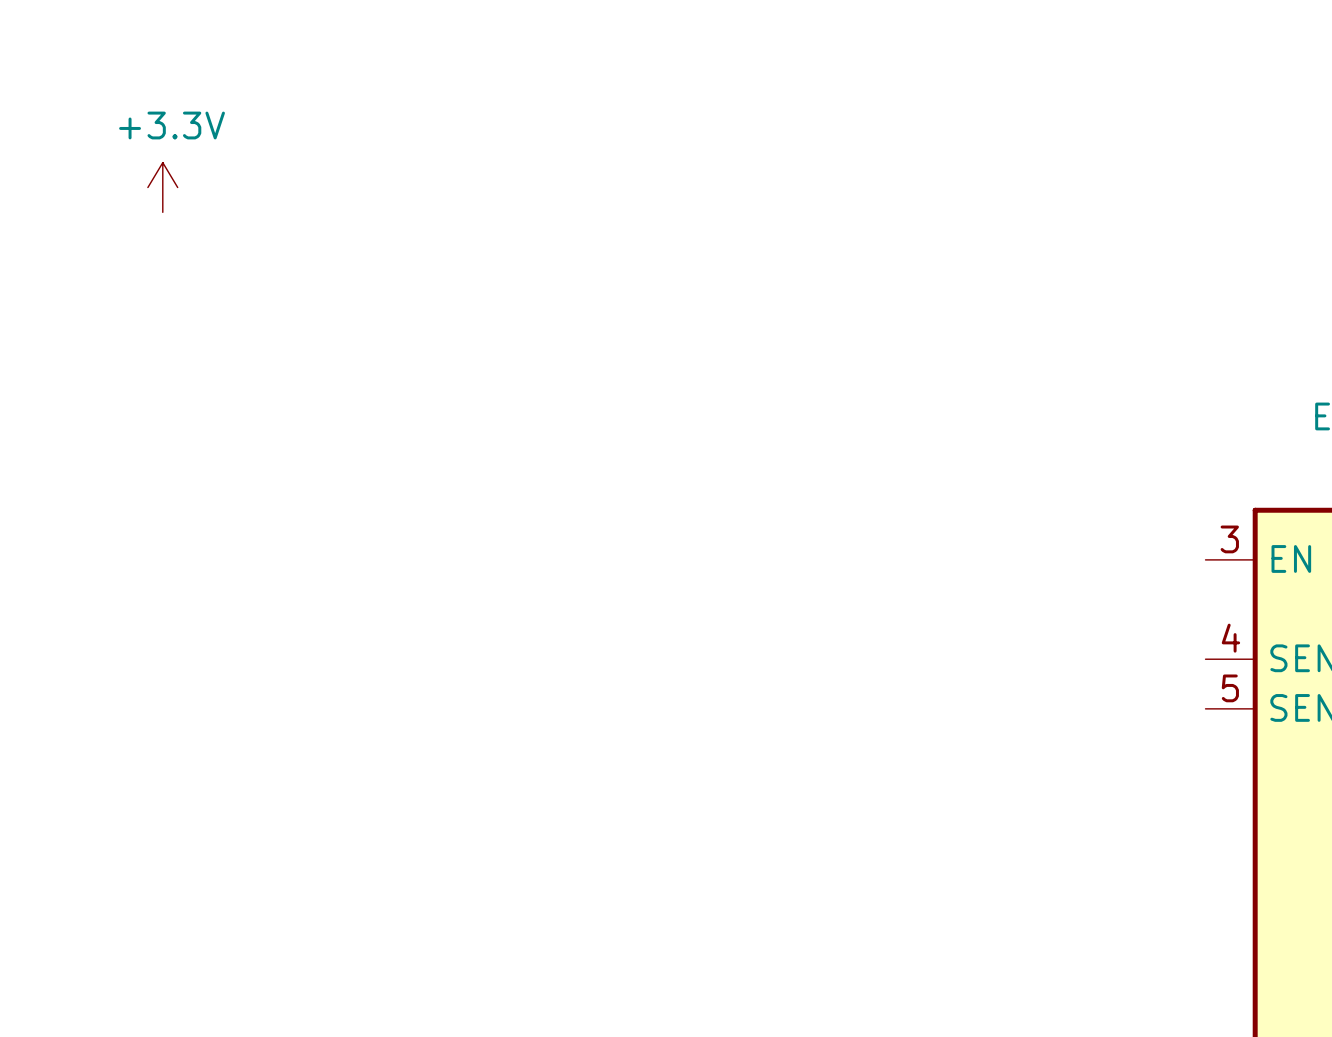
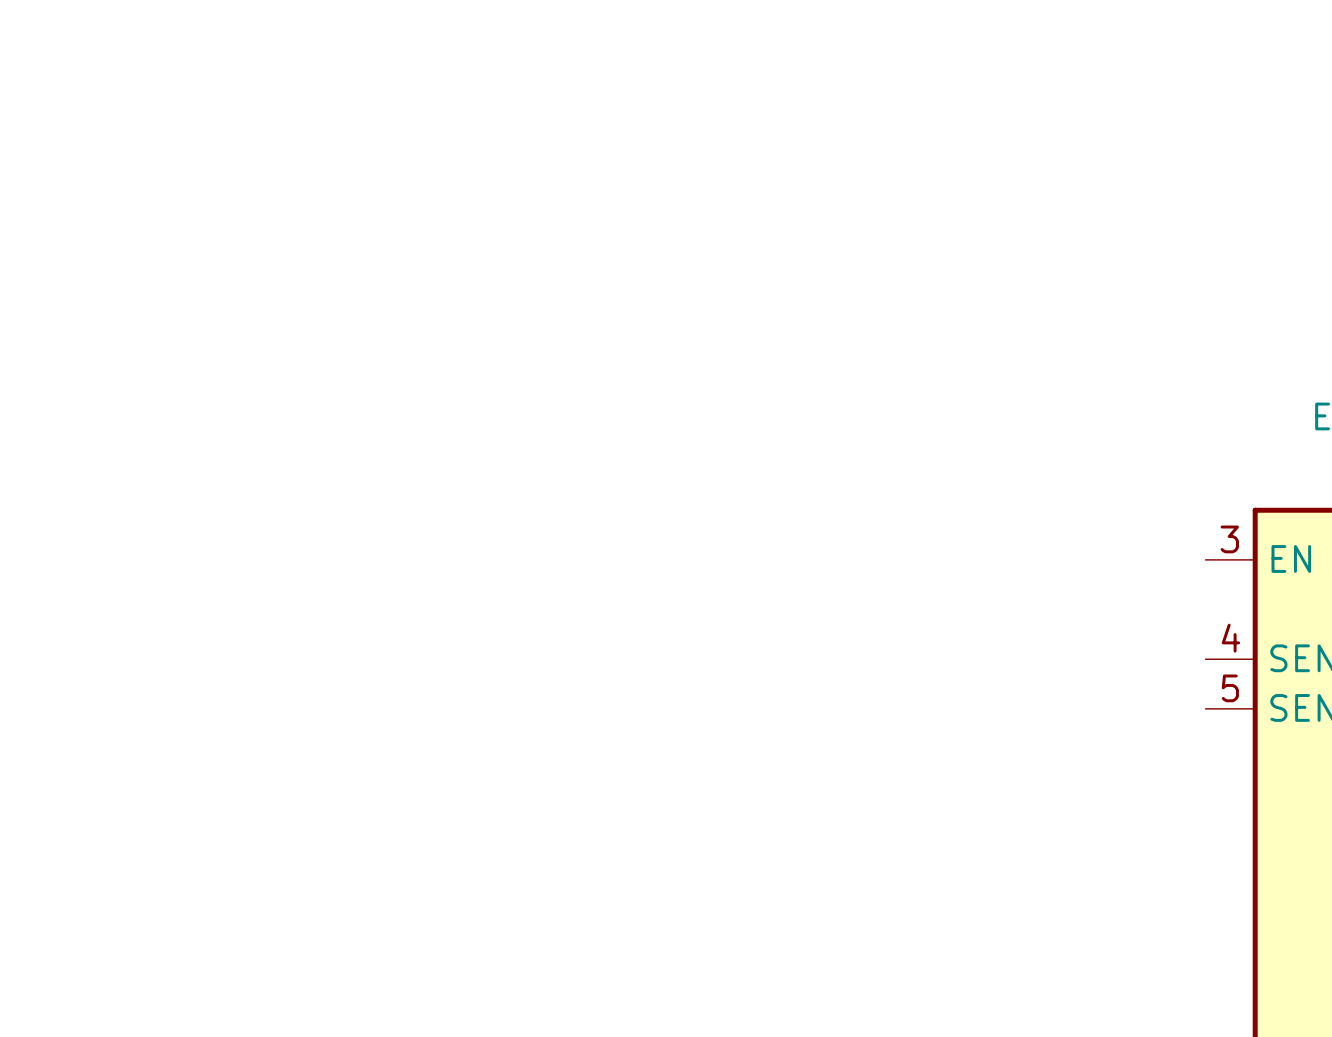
power symbol: +3.3V (162, 187) -> none

